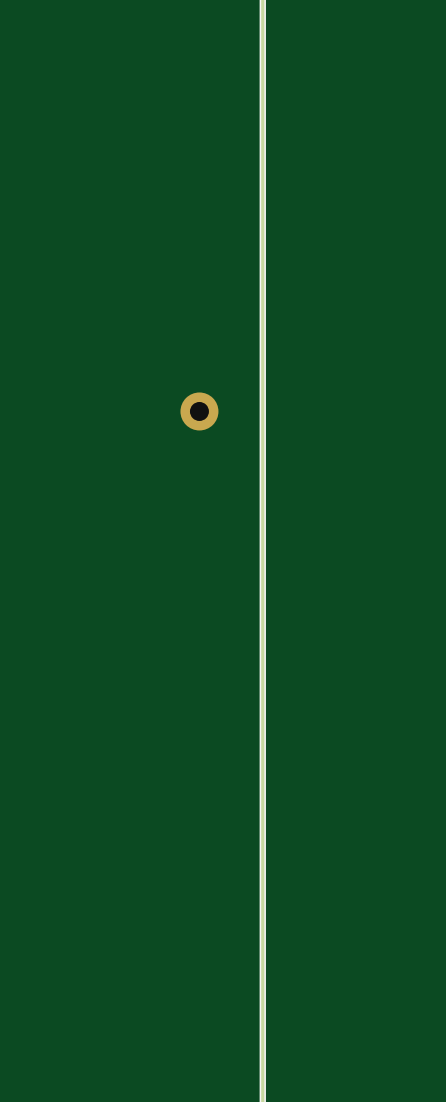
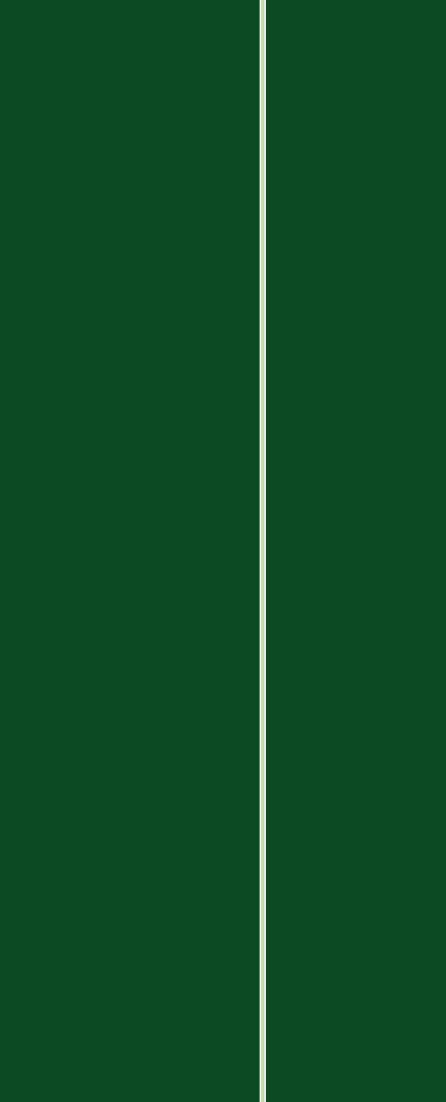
via: (199, 411) -> none

